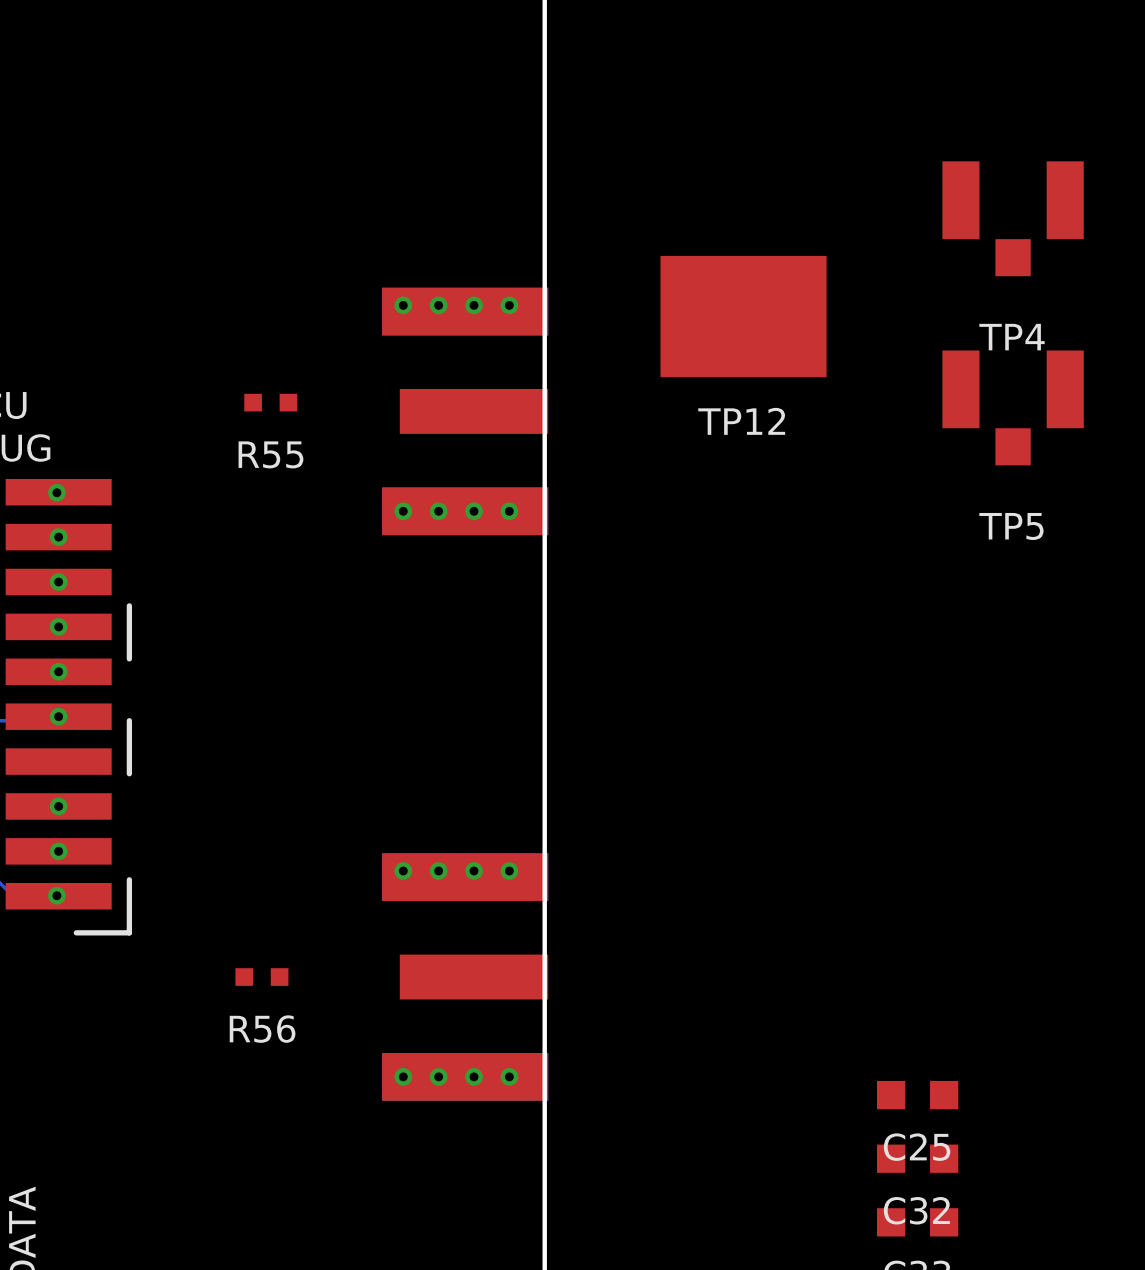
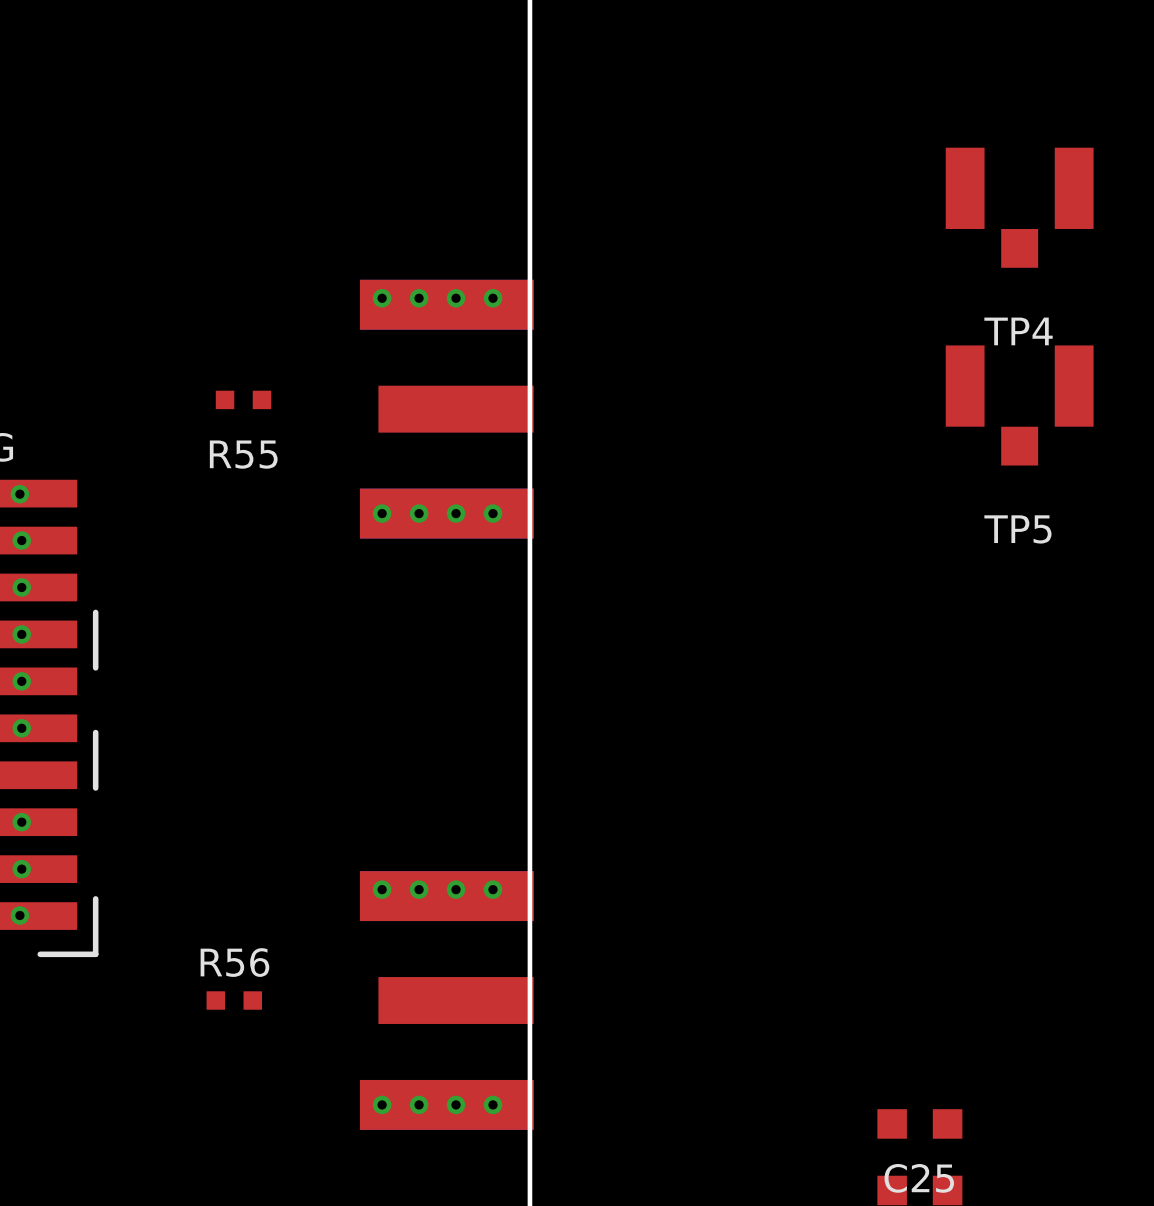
TP12: (743, 316) -> none
R56 name position: R56 (262, 1029) -> R56 (234, 962)

